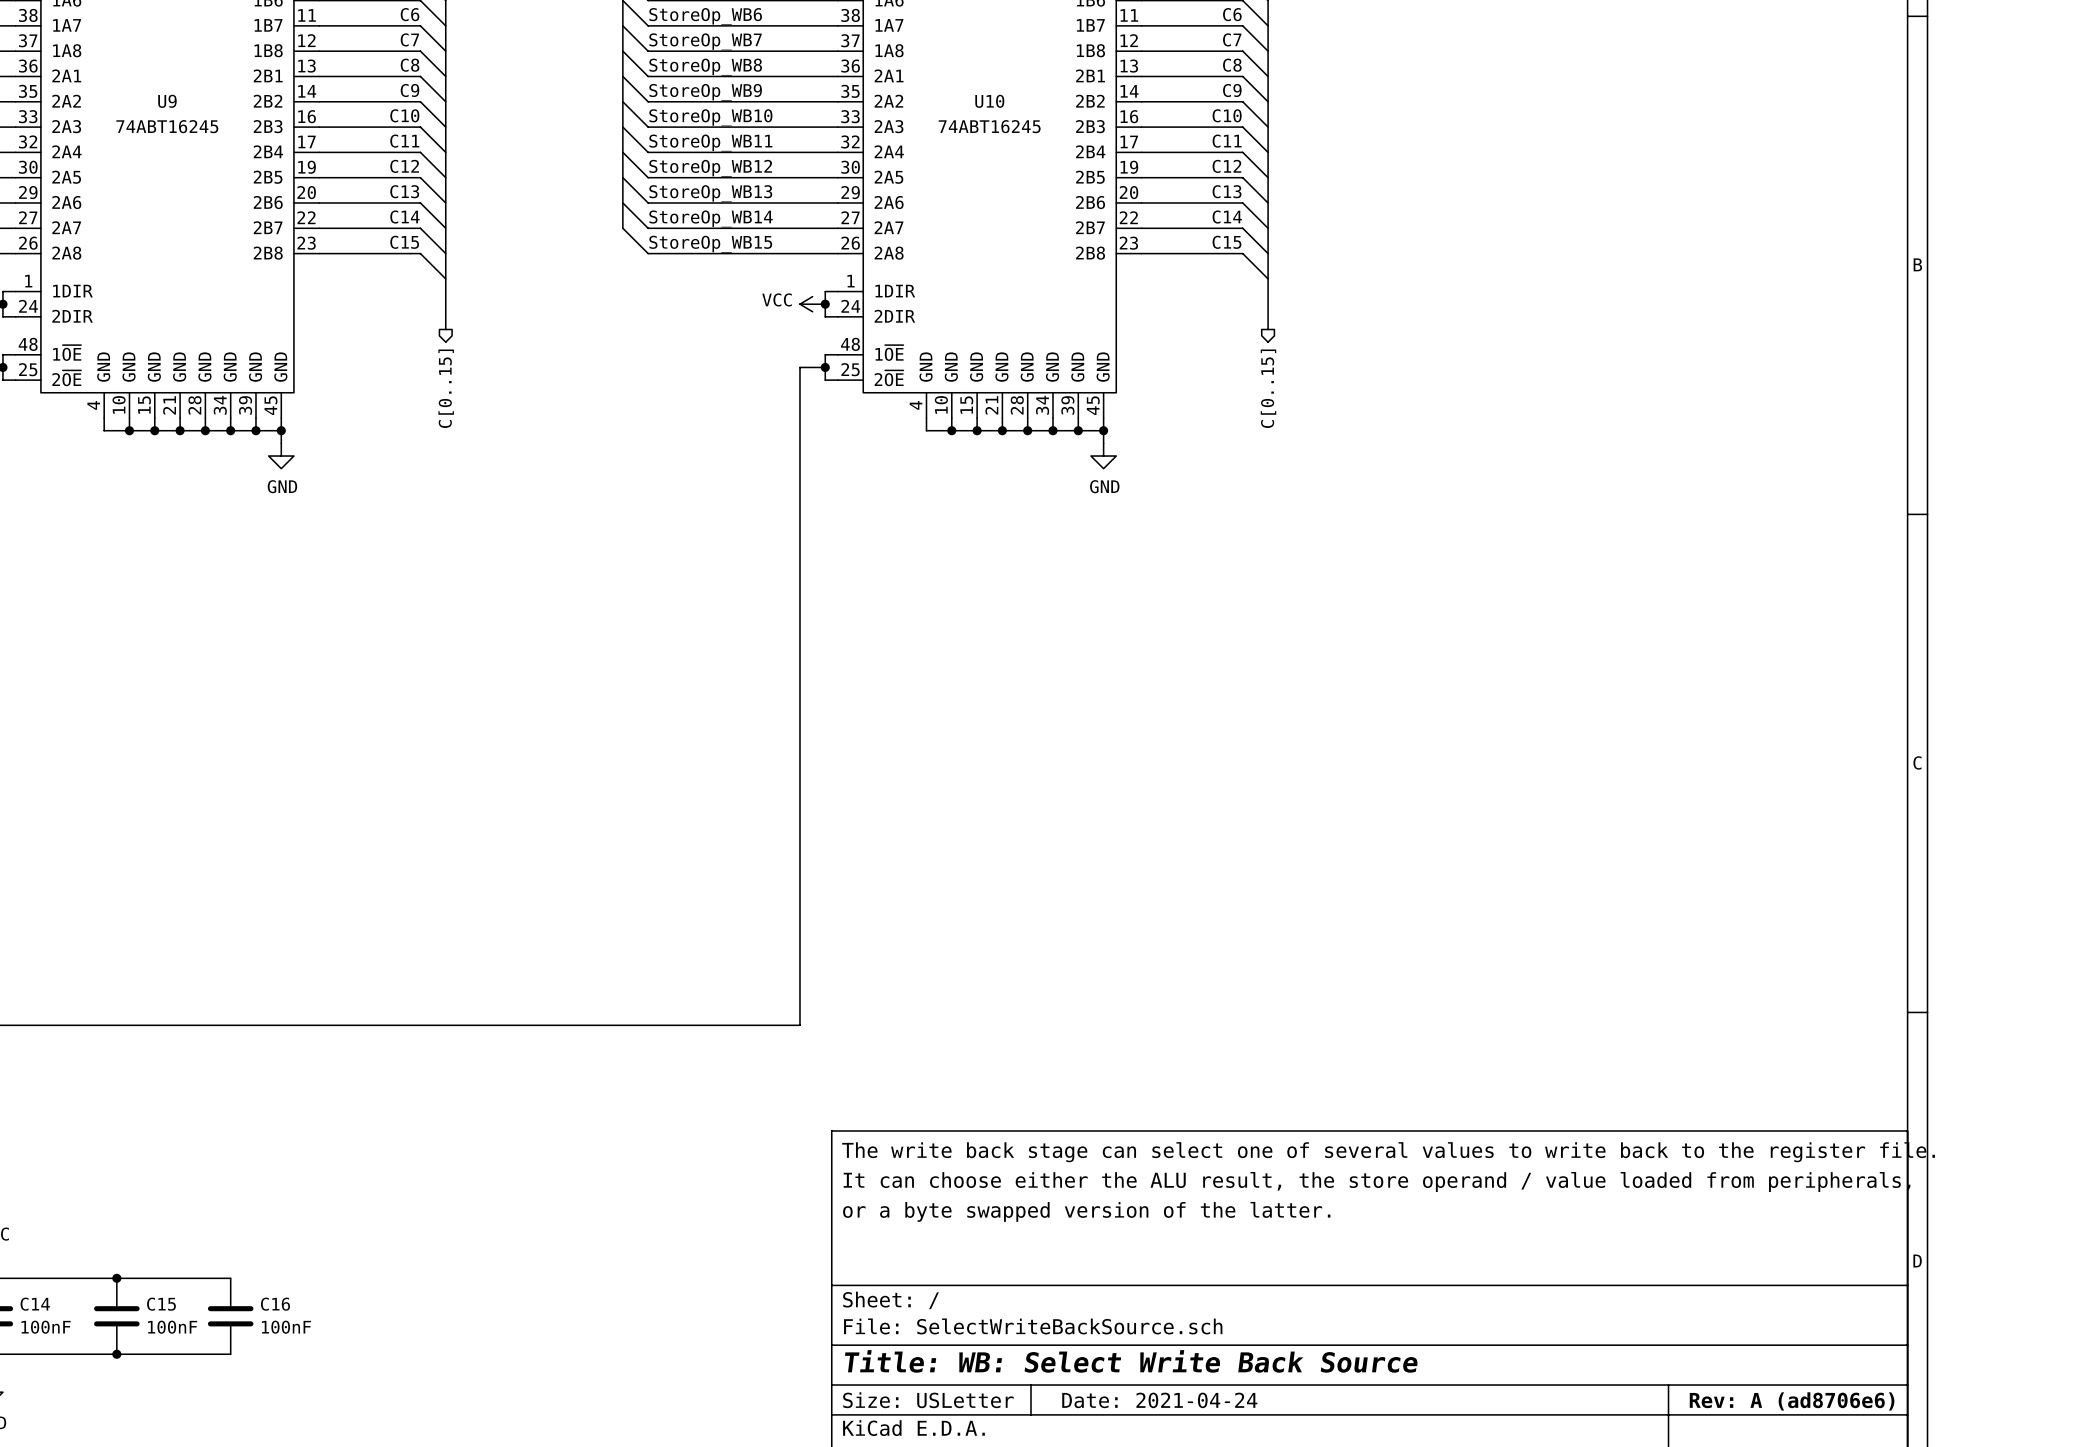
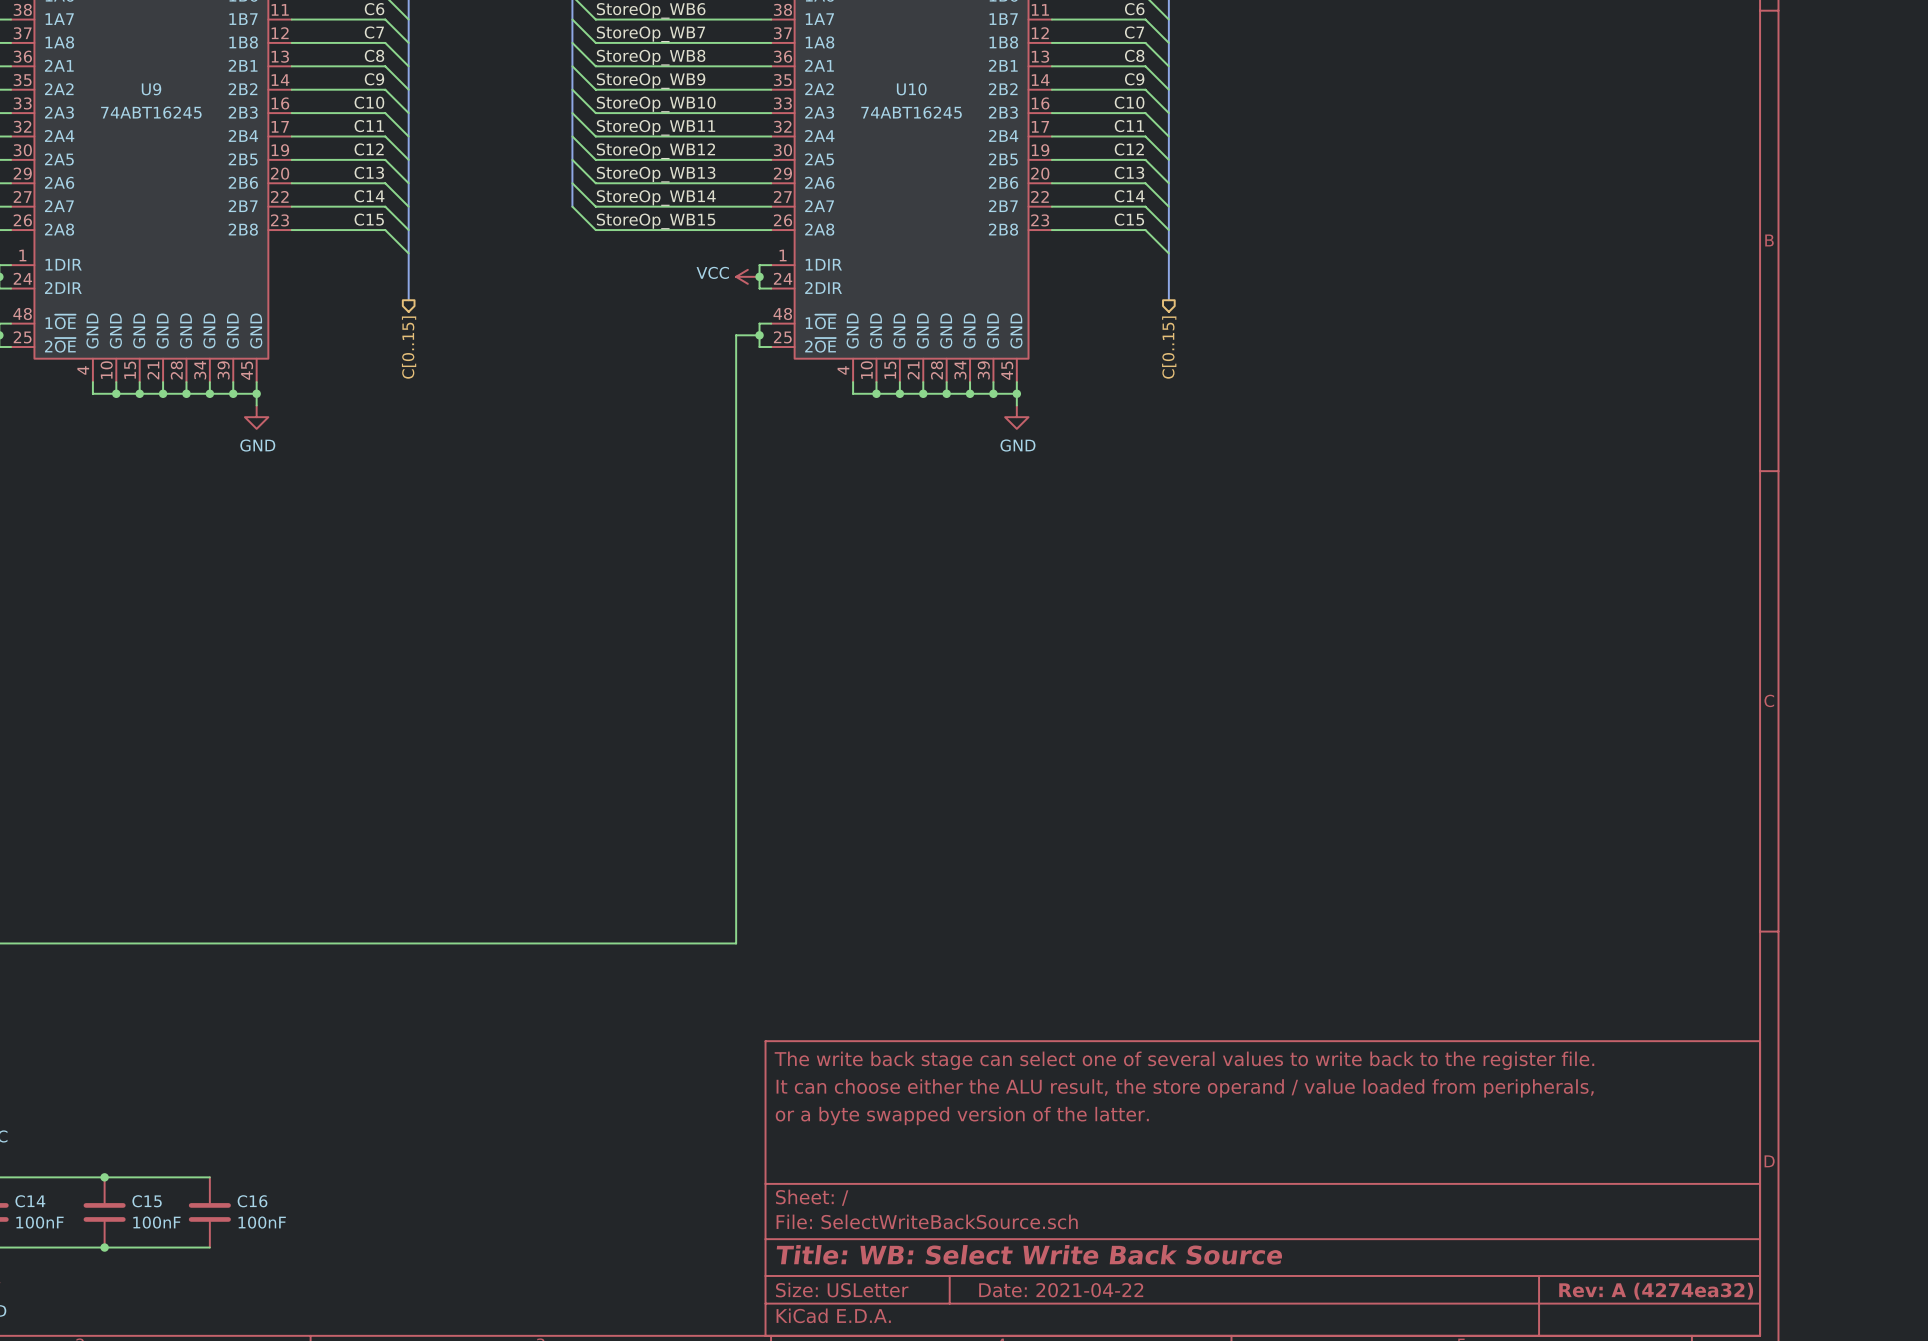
title block: Date: 2021-04-24 (1159, 1400) -> Date: 2021-04-22 (1061, 1290)
title block: Rev: A (ad8706e6) (1792, 1401) -> Rev: A (4274ea32) (1656, 1291)

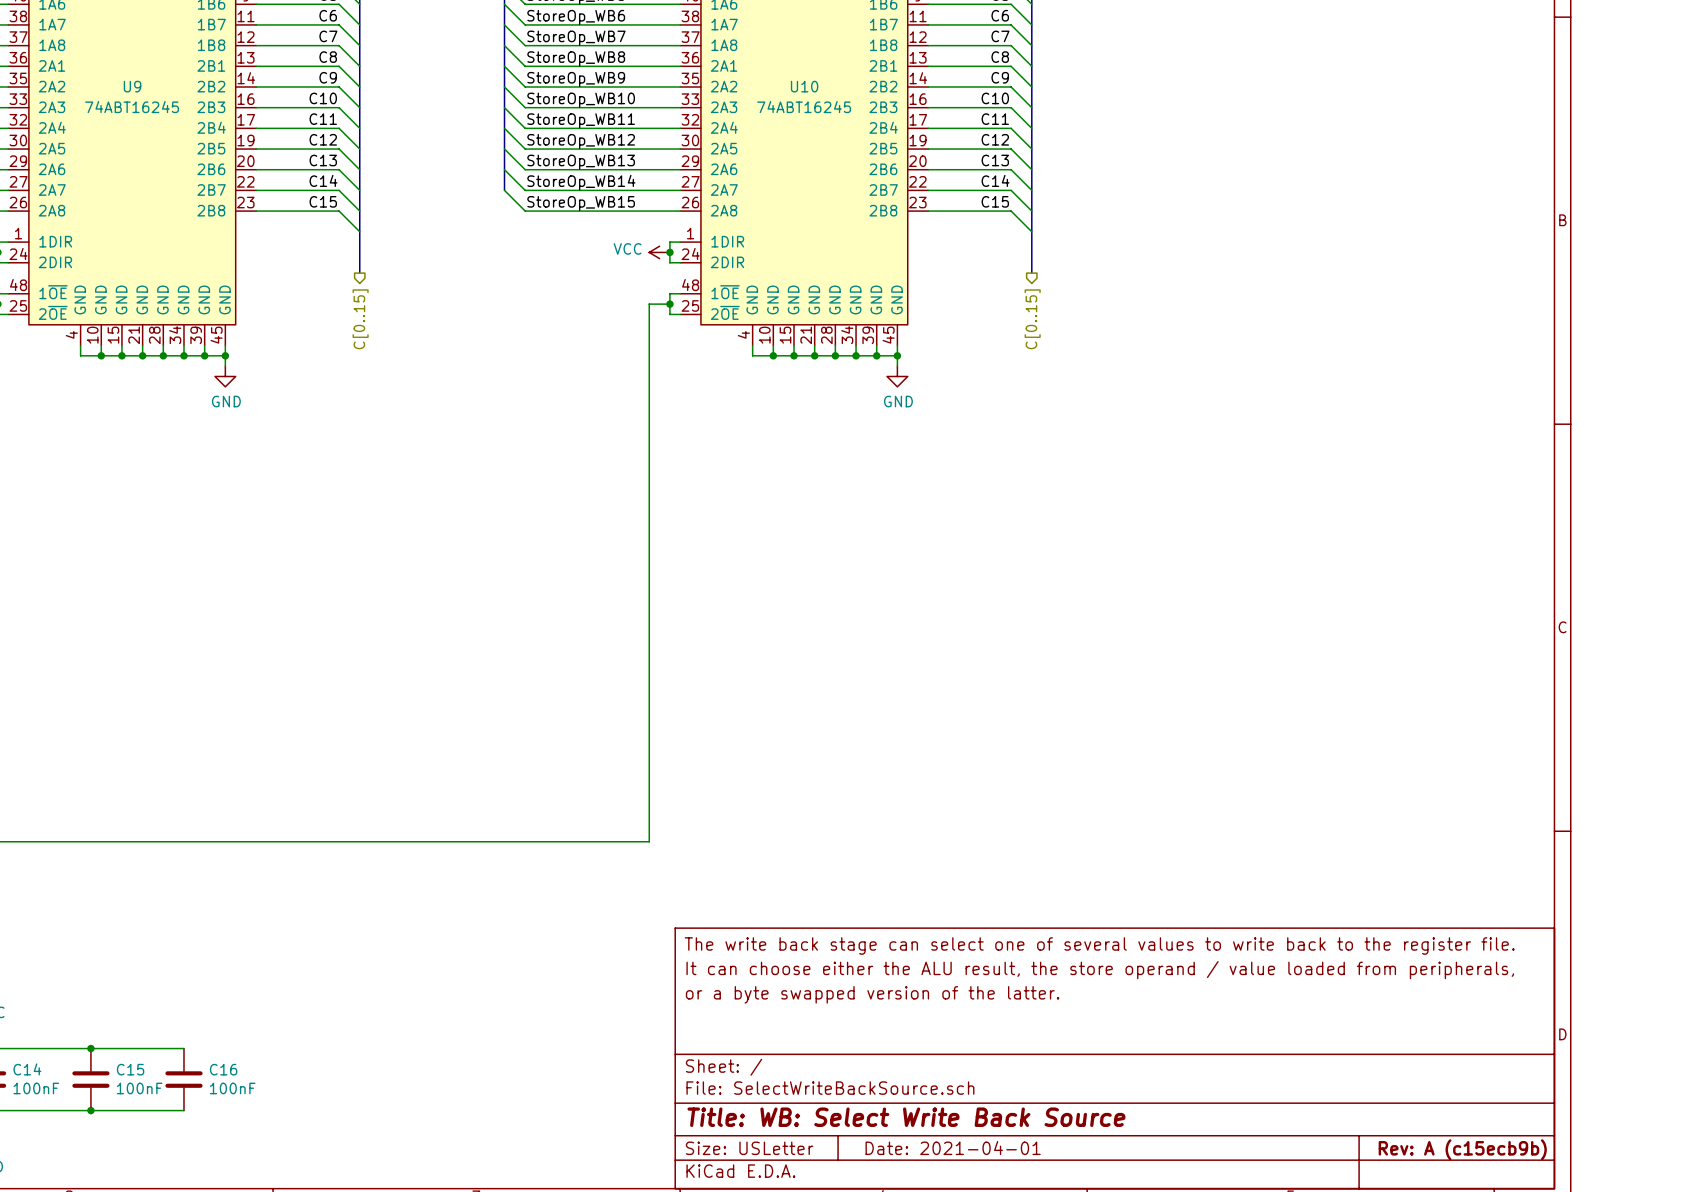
title block: Date: 2021-04-22 (1061, 1290) -> Date: 2021-04-01 (953, 1148)
title block: Rev: A (4274ea32) (1656, 1291) -> Rev: A (c15ecb9b) (1462, 1149)

